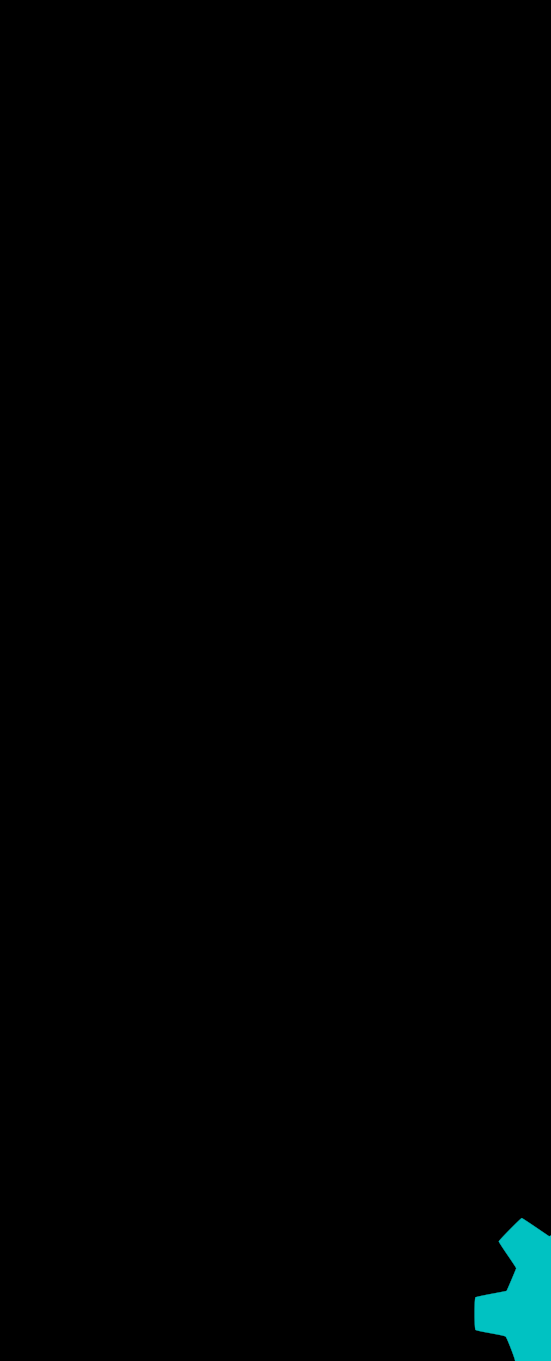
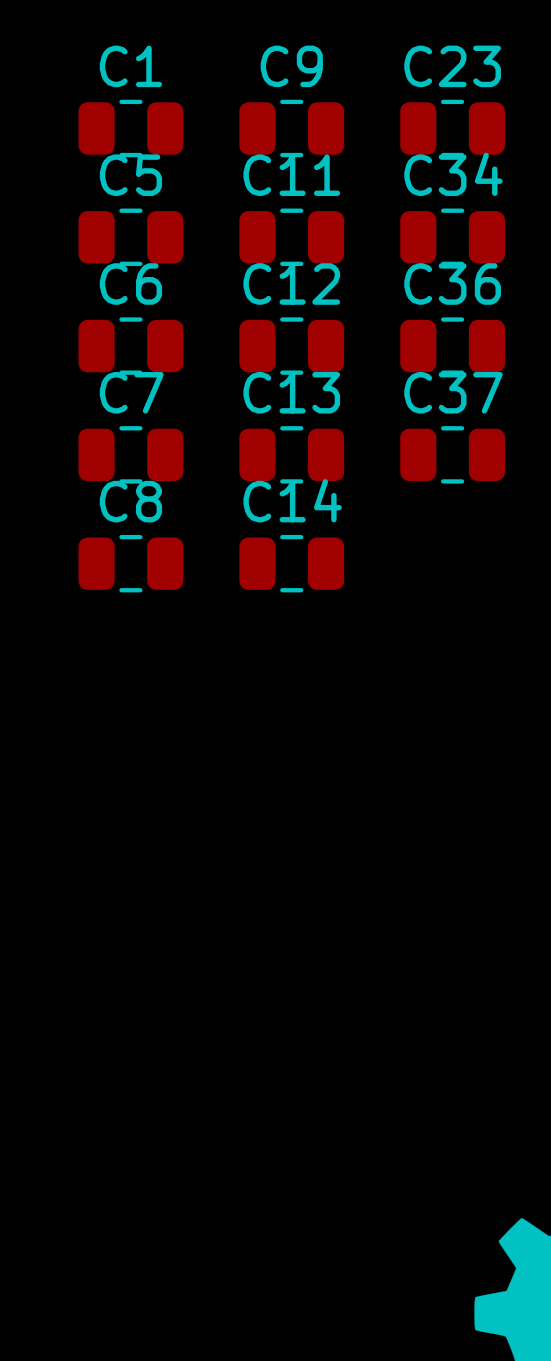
C1: none -> (130, 128)
C9: none -> (291, 128)
C23: none -> (452, 128)
C5: none -> (130, 237)
C11: none -> (291, 237)
C34: none -> (452, 237)
C6: none -> (130, 346)
C12: none -> (291, 346)
C36: none -> (452, 346)
C7: none -> (130, 454)
C13: none -> (291, 454)
C37: none -> (452, 454)
C8: none -> (130, 563)
C14: none -> (291, 563)

